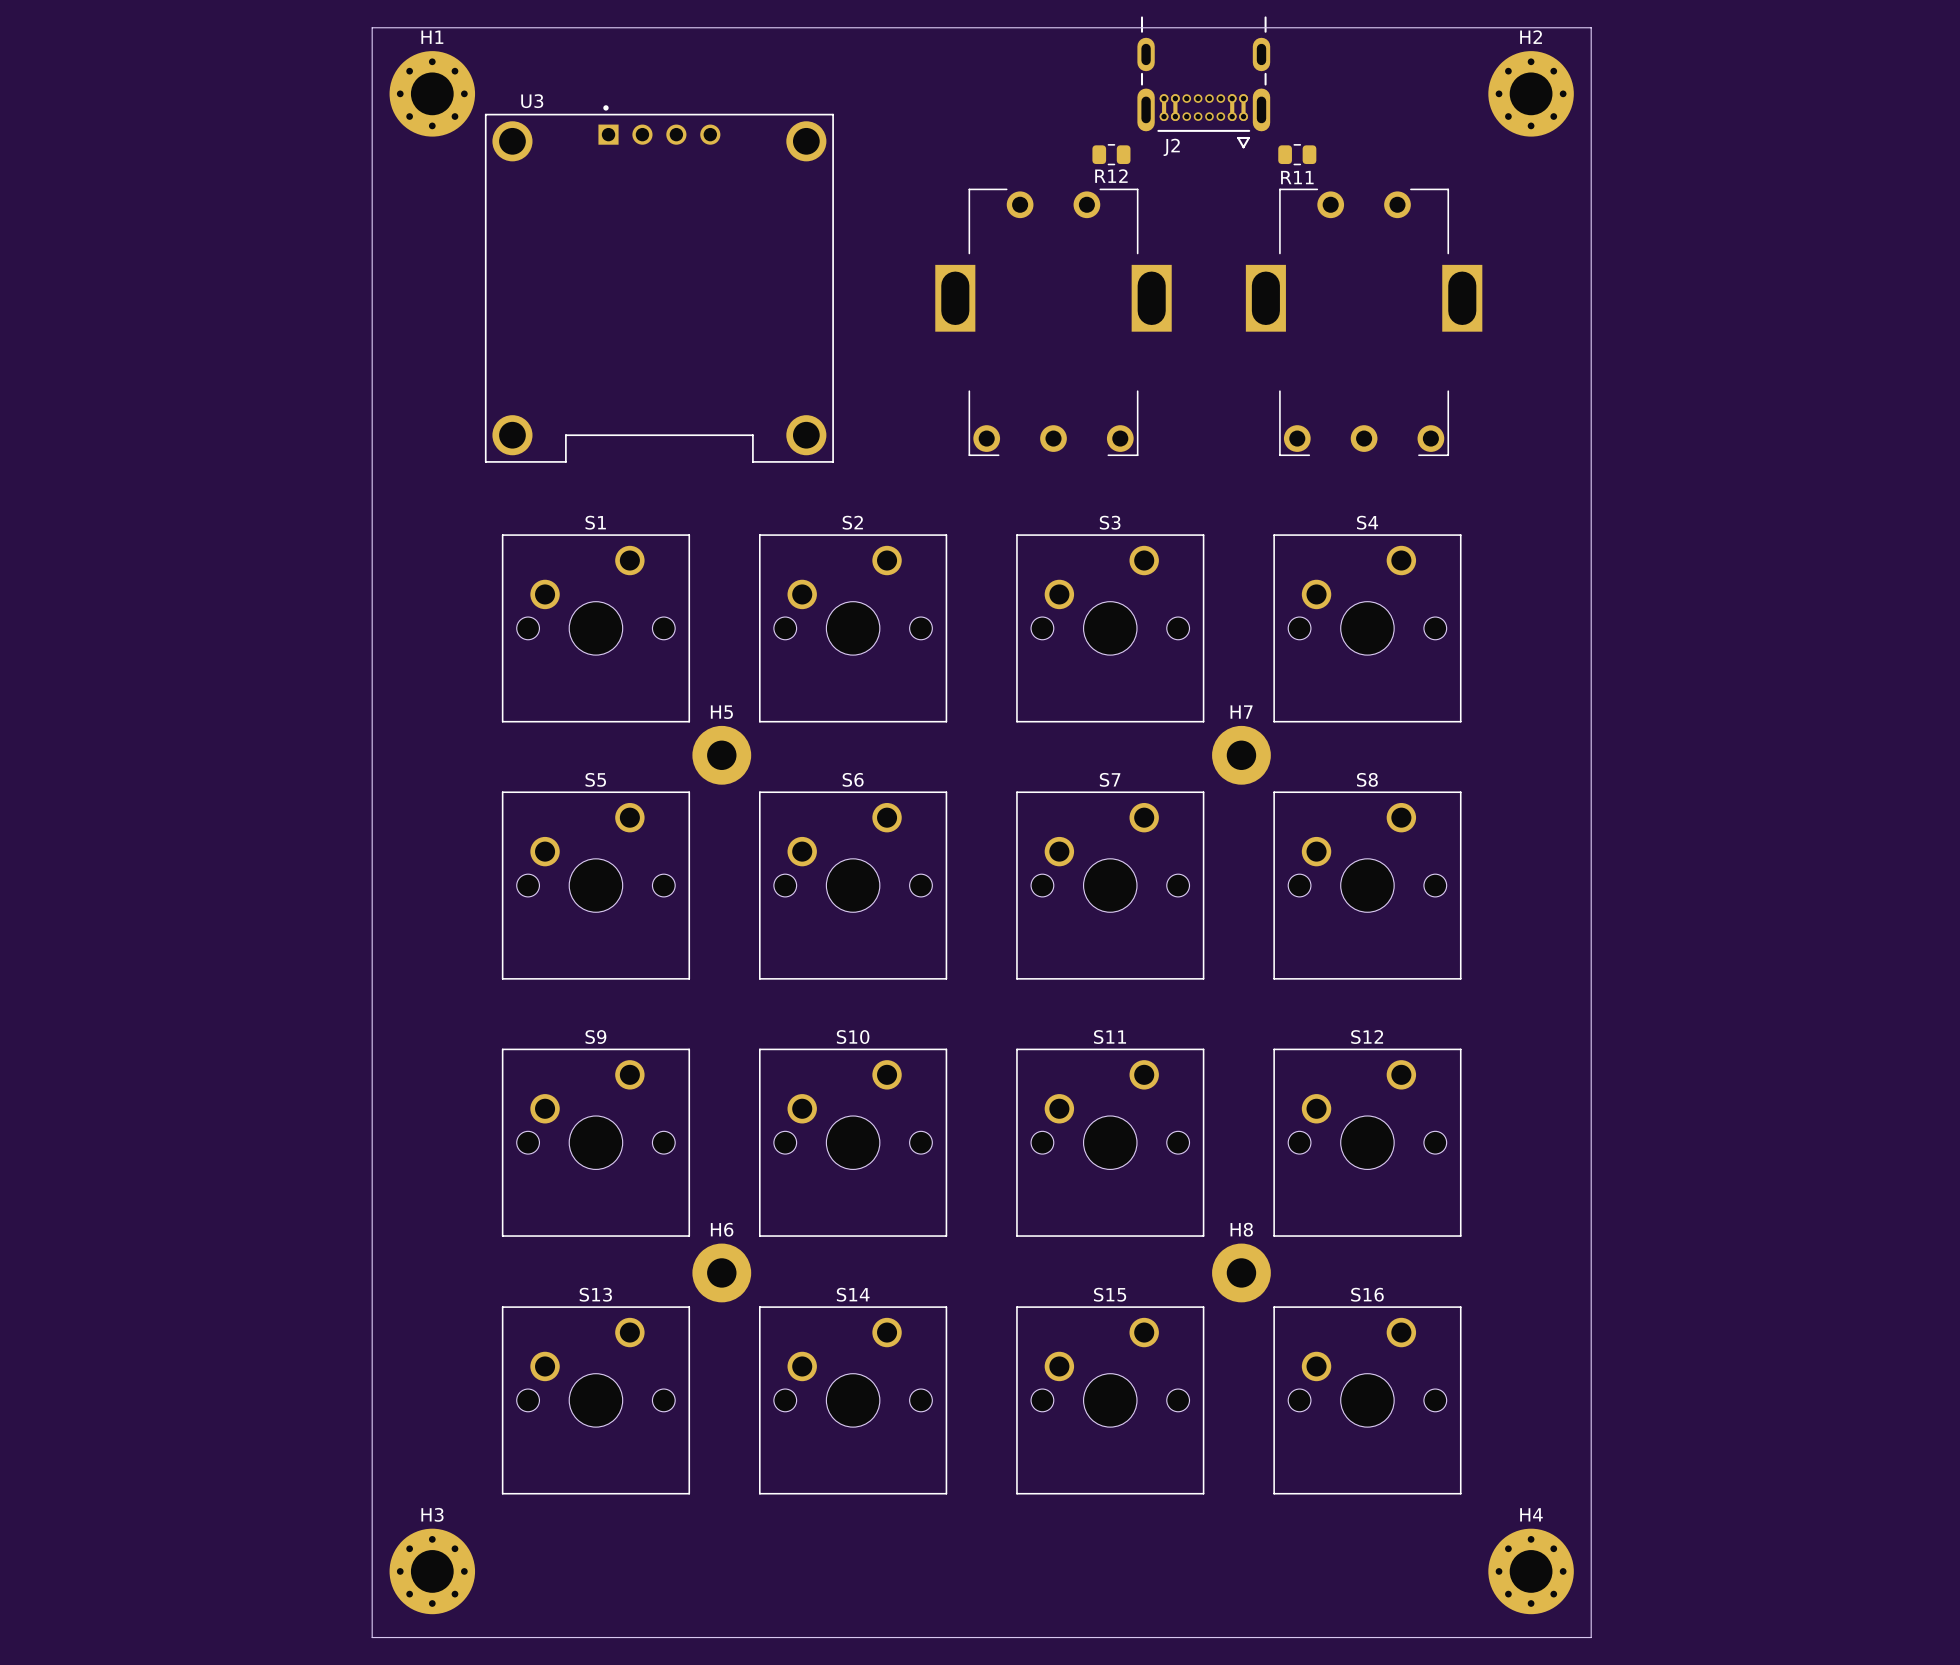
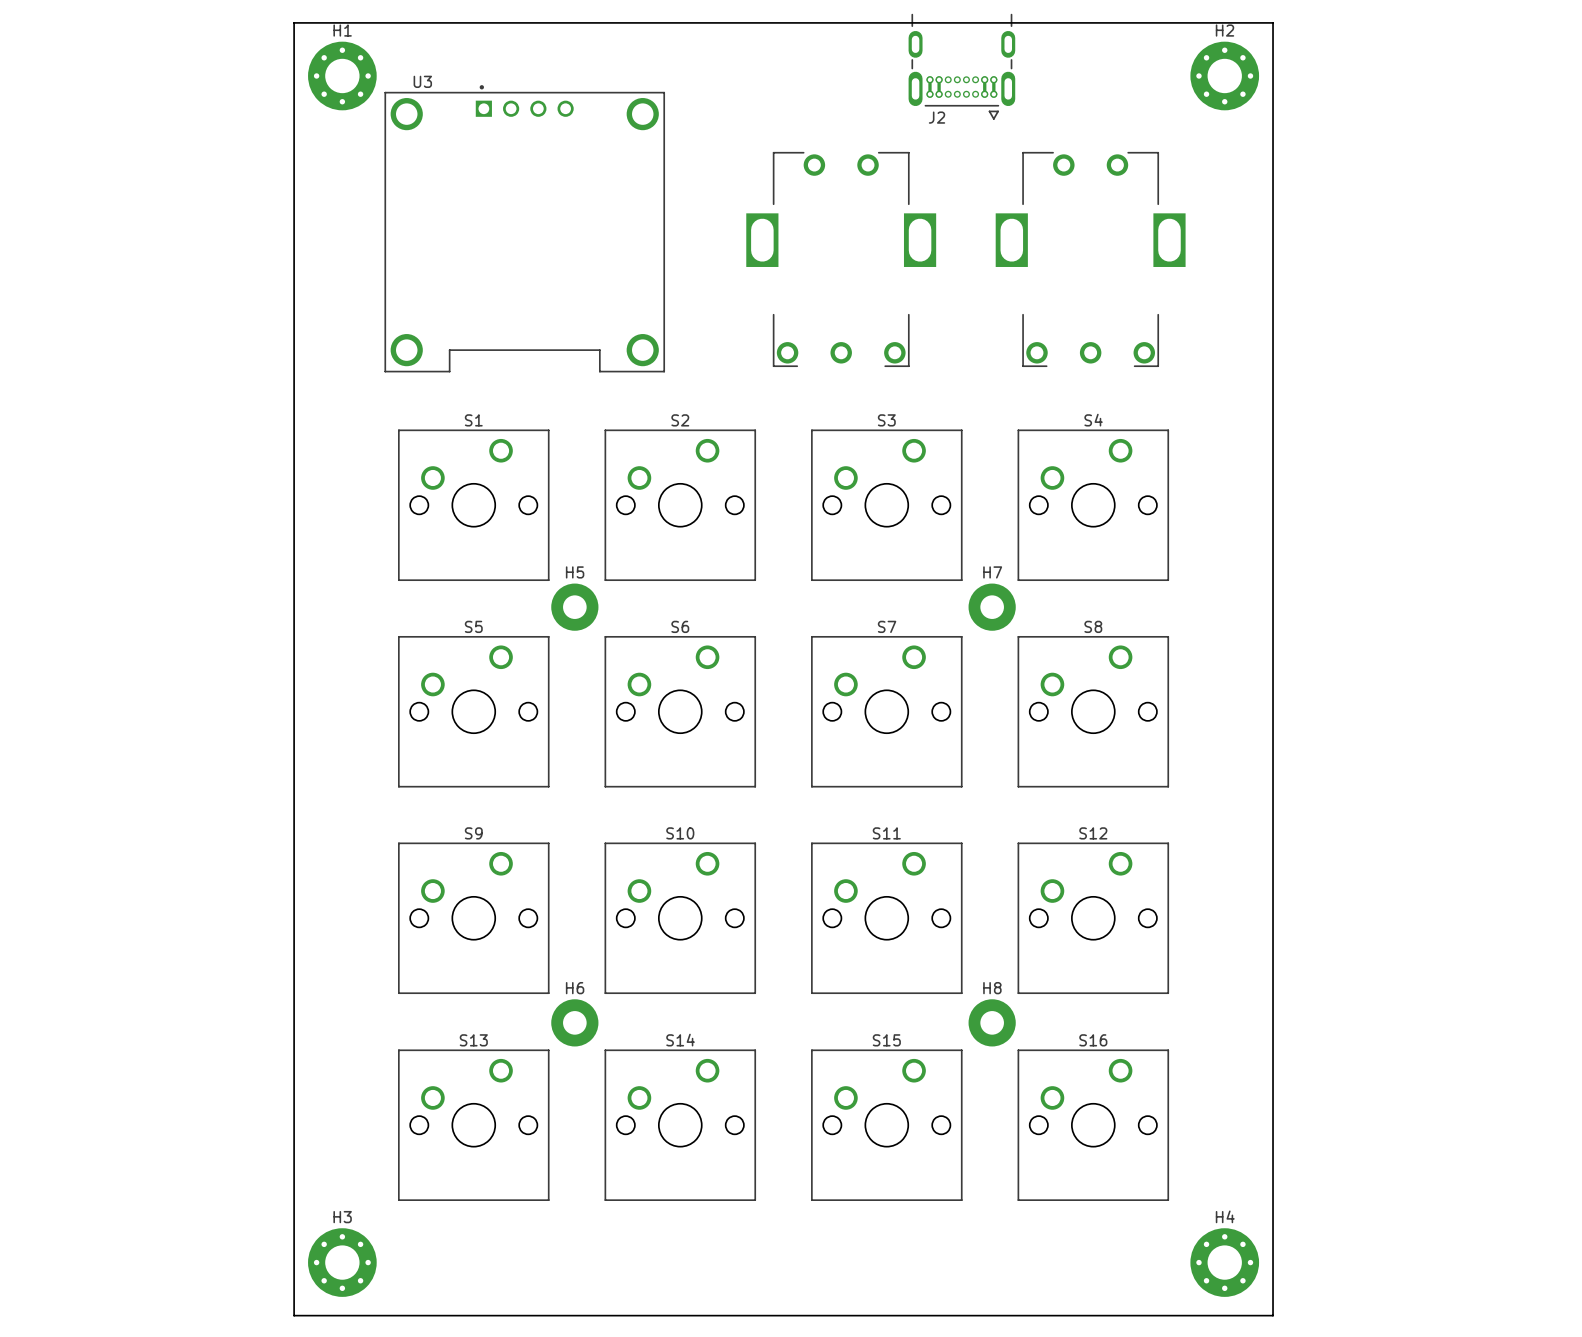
R12: (1111, 154) -> none
R11: (1297, 154) -> none

